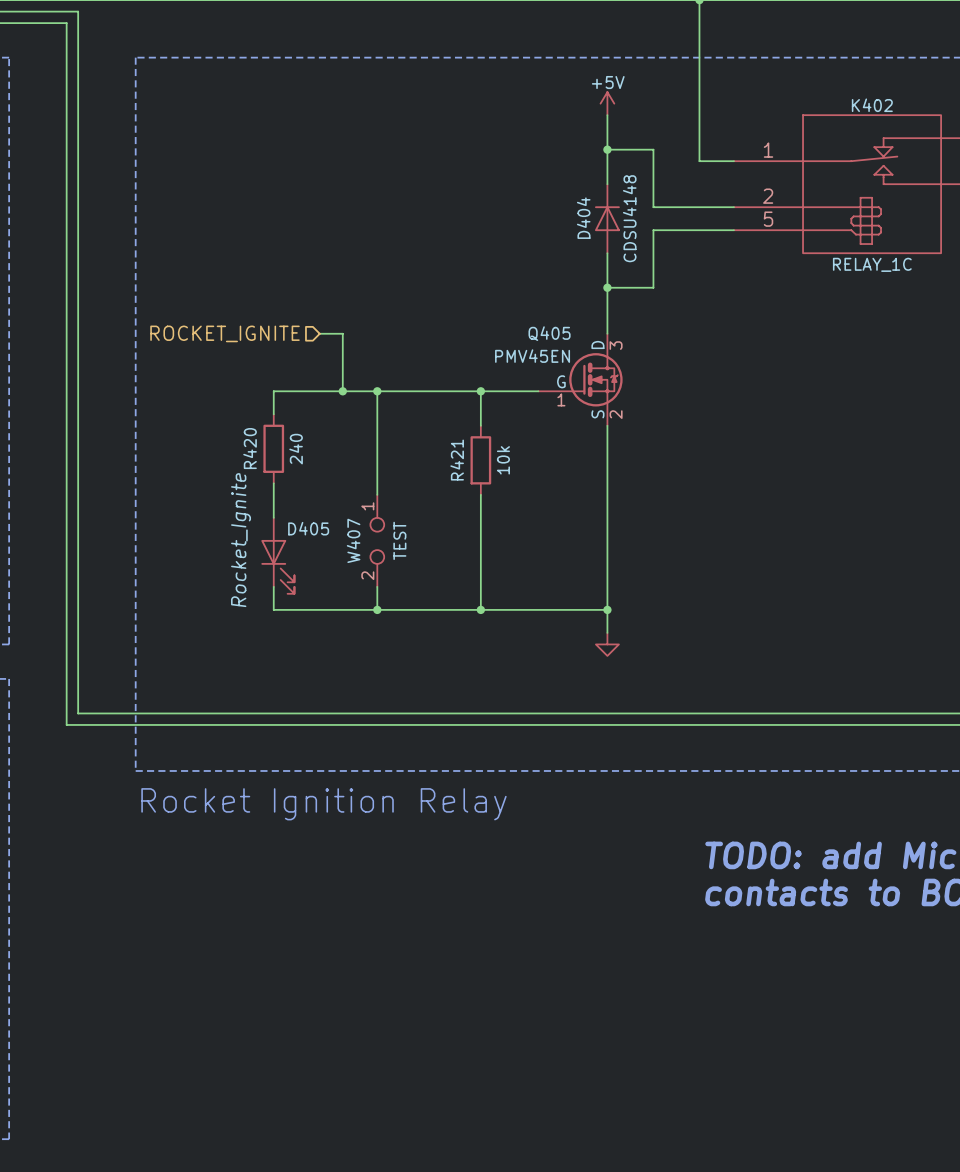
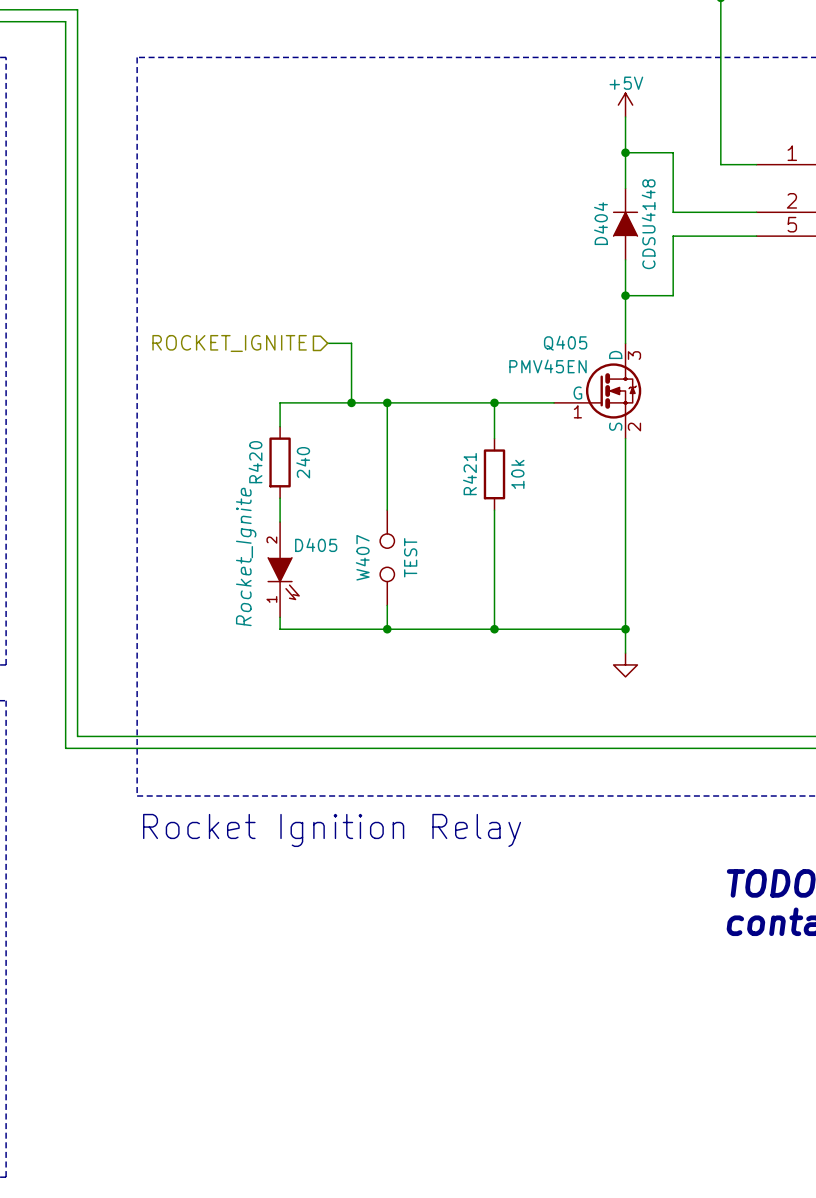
D404 symbol: [595, 184, 620, 254] -> [612, 188, 639, 260]
W407 pin number: 1 (367, 506) -> none
D405 symbol: [261, 517, 295, 594] -> [268, 522, 300, 618]
W407 pin number: 2 (367, 575) -> none

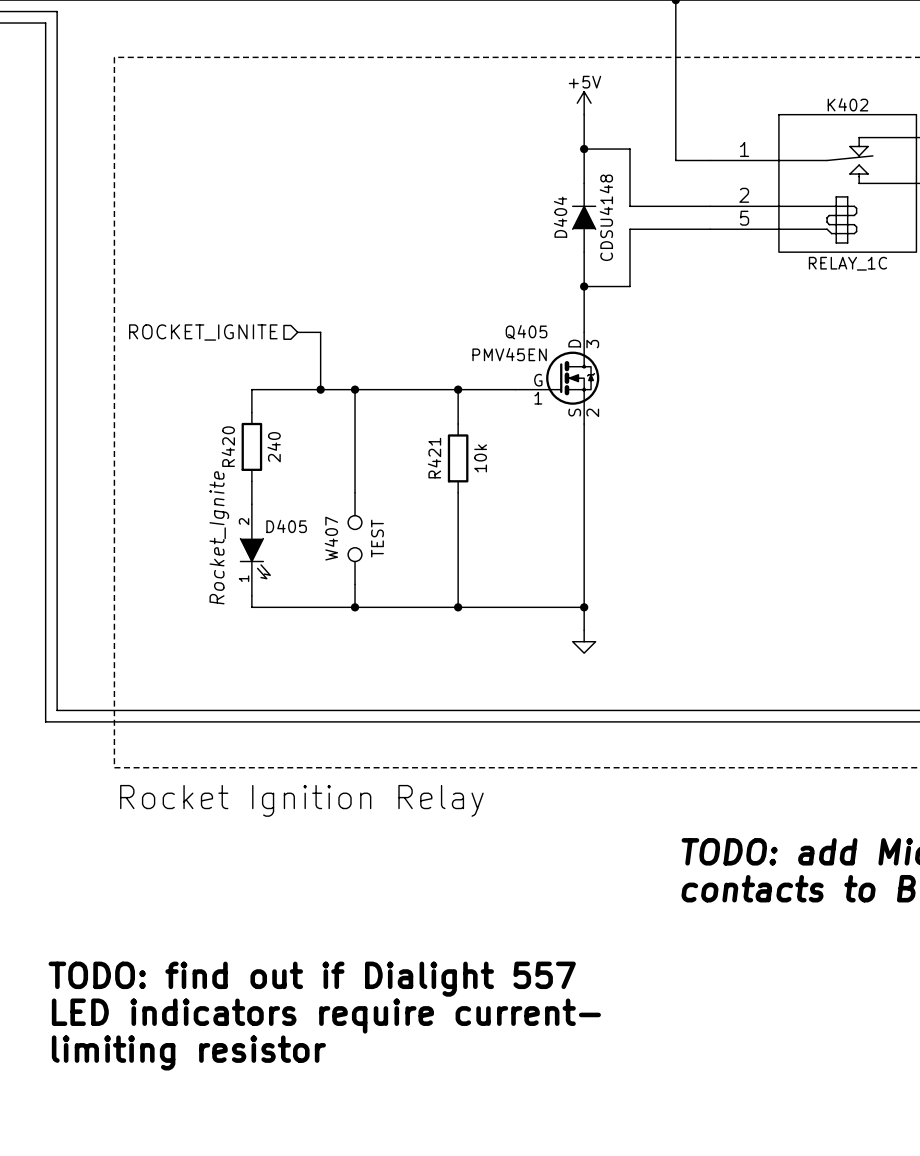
text: none -> TODO: find out if Dialight 557 (312, 979)
text: none -> LED indicators require current- (326, 1016)
text: none -> limiting resistor (188, 1052)

